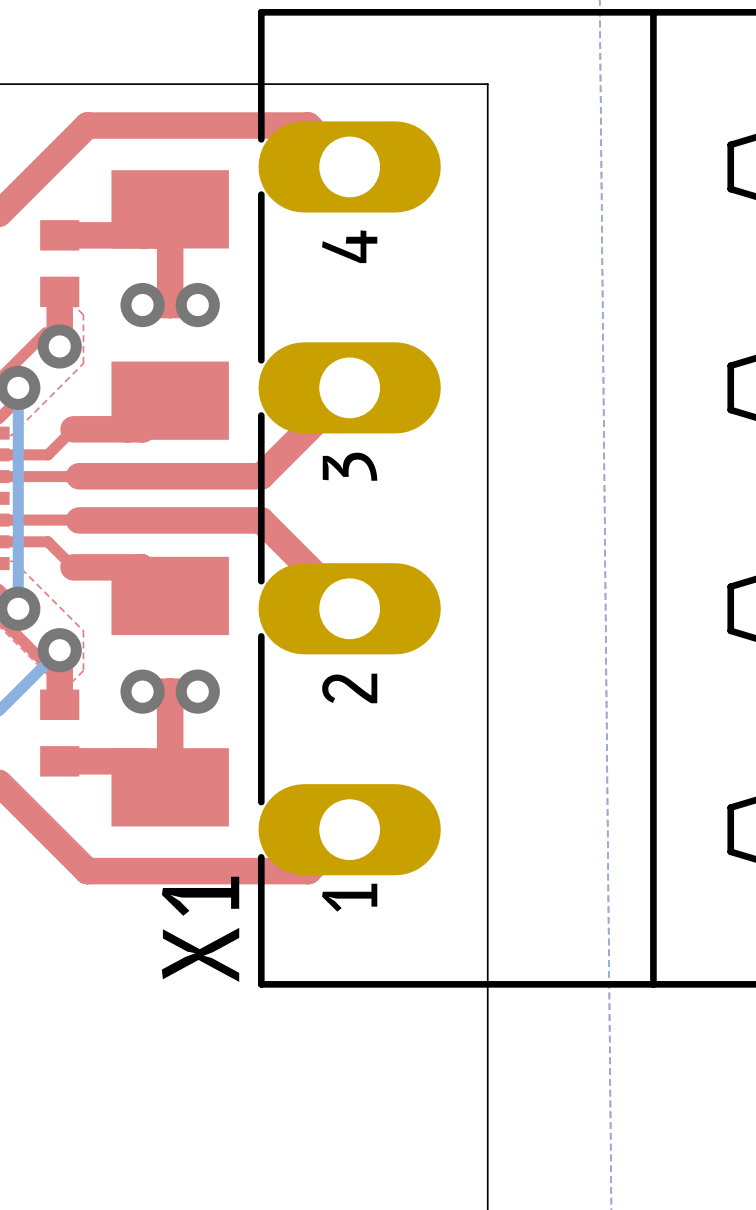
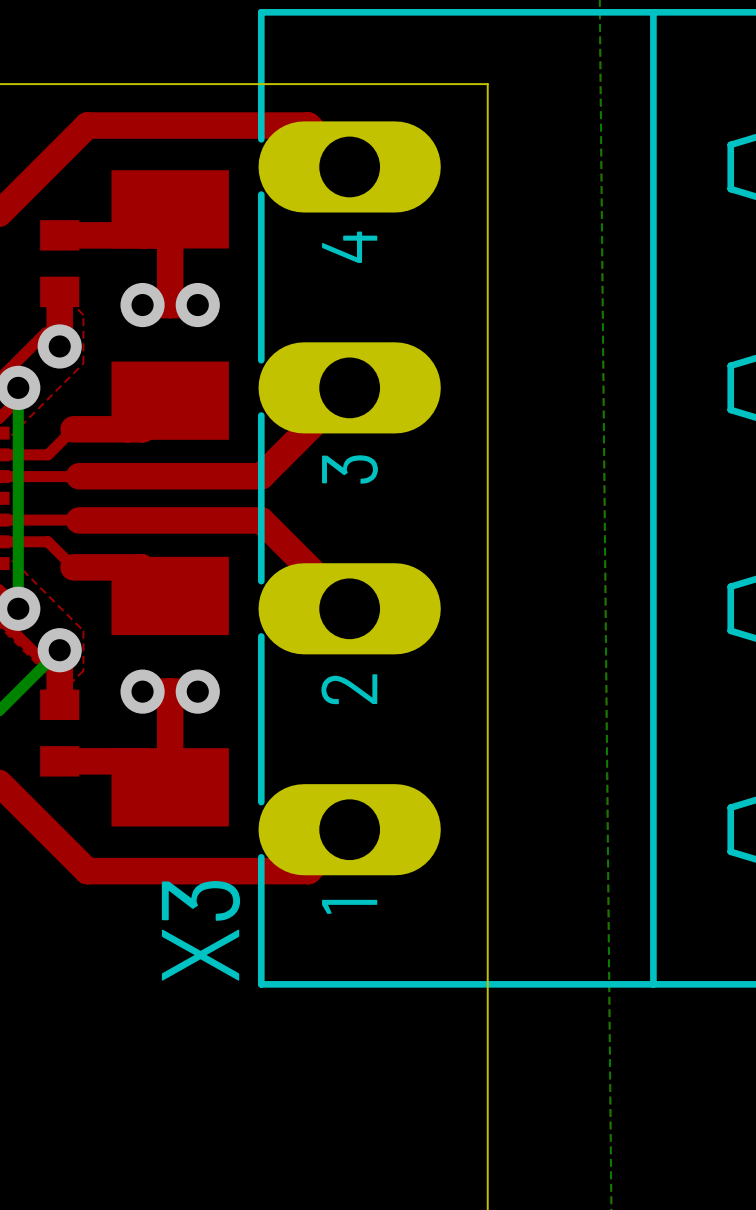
X1 name: X1 (200, 929) -> X3 (200, 930)

